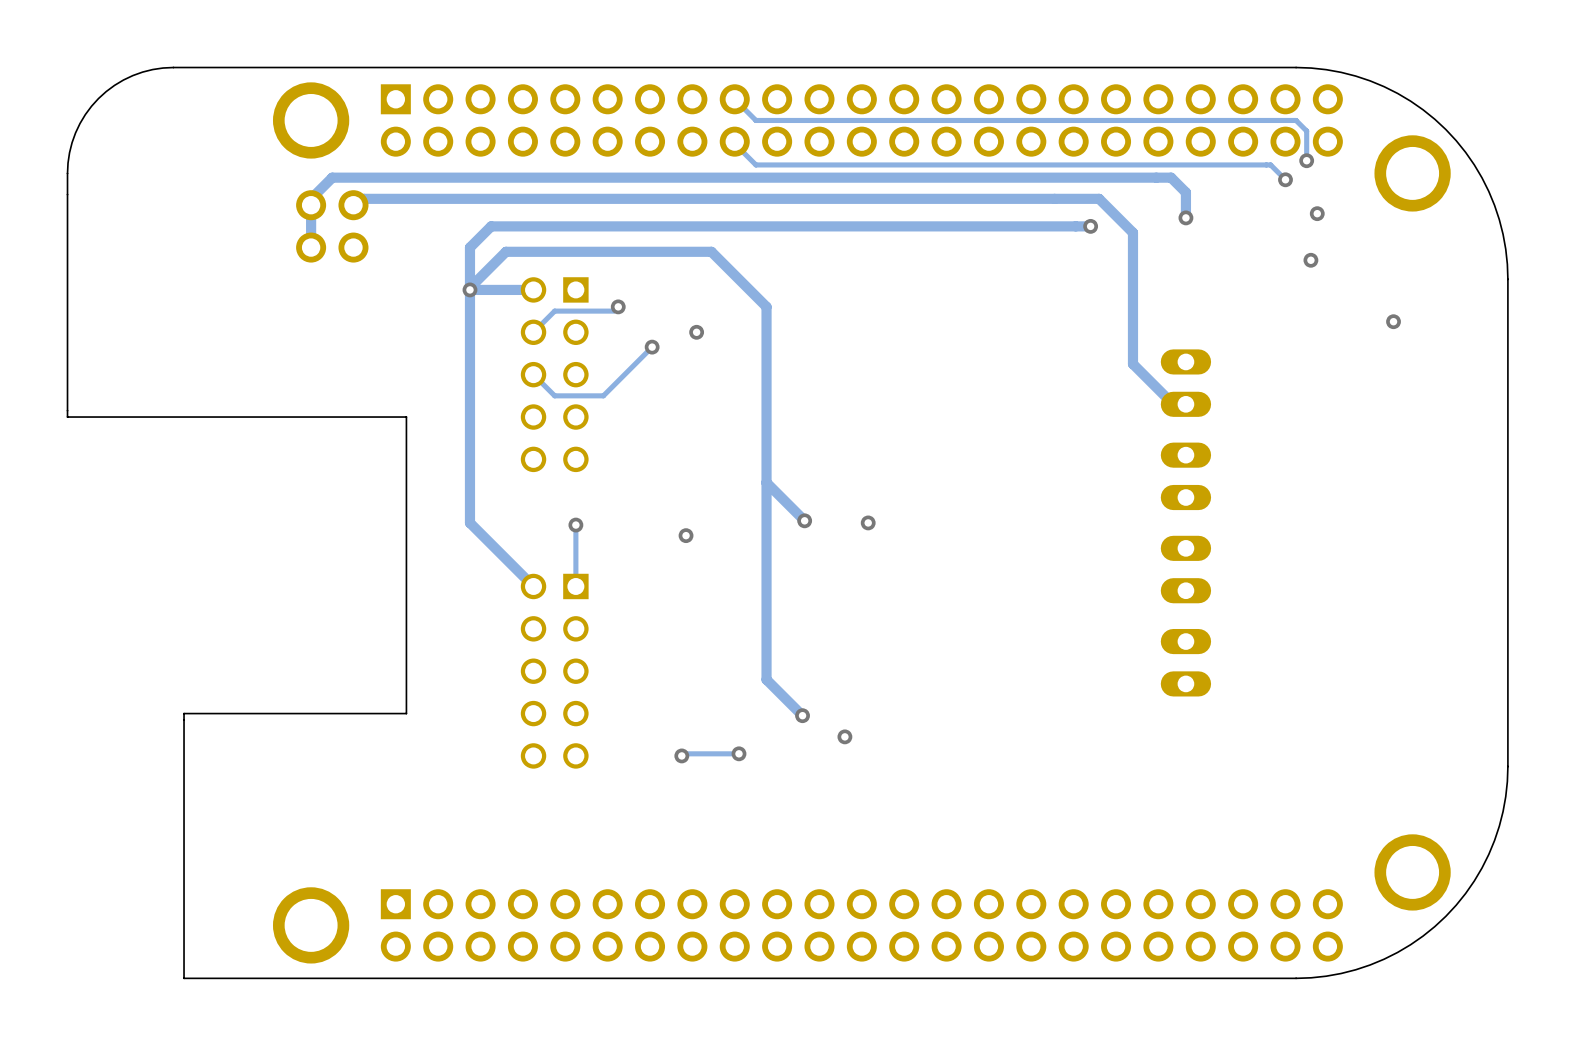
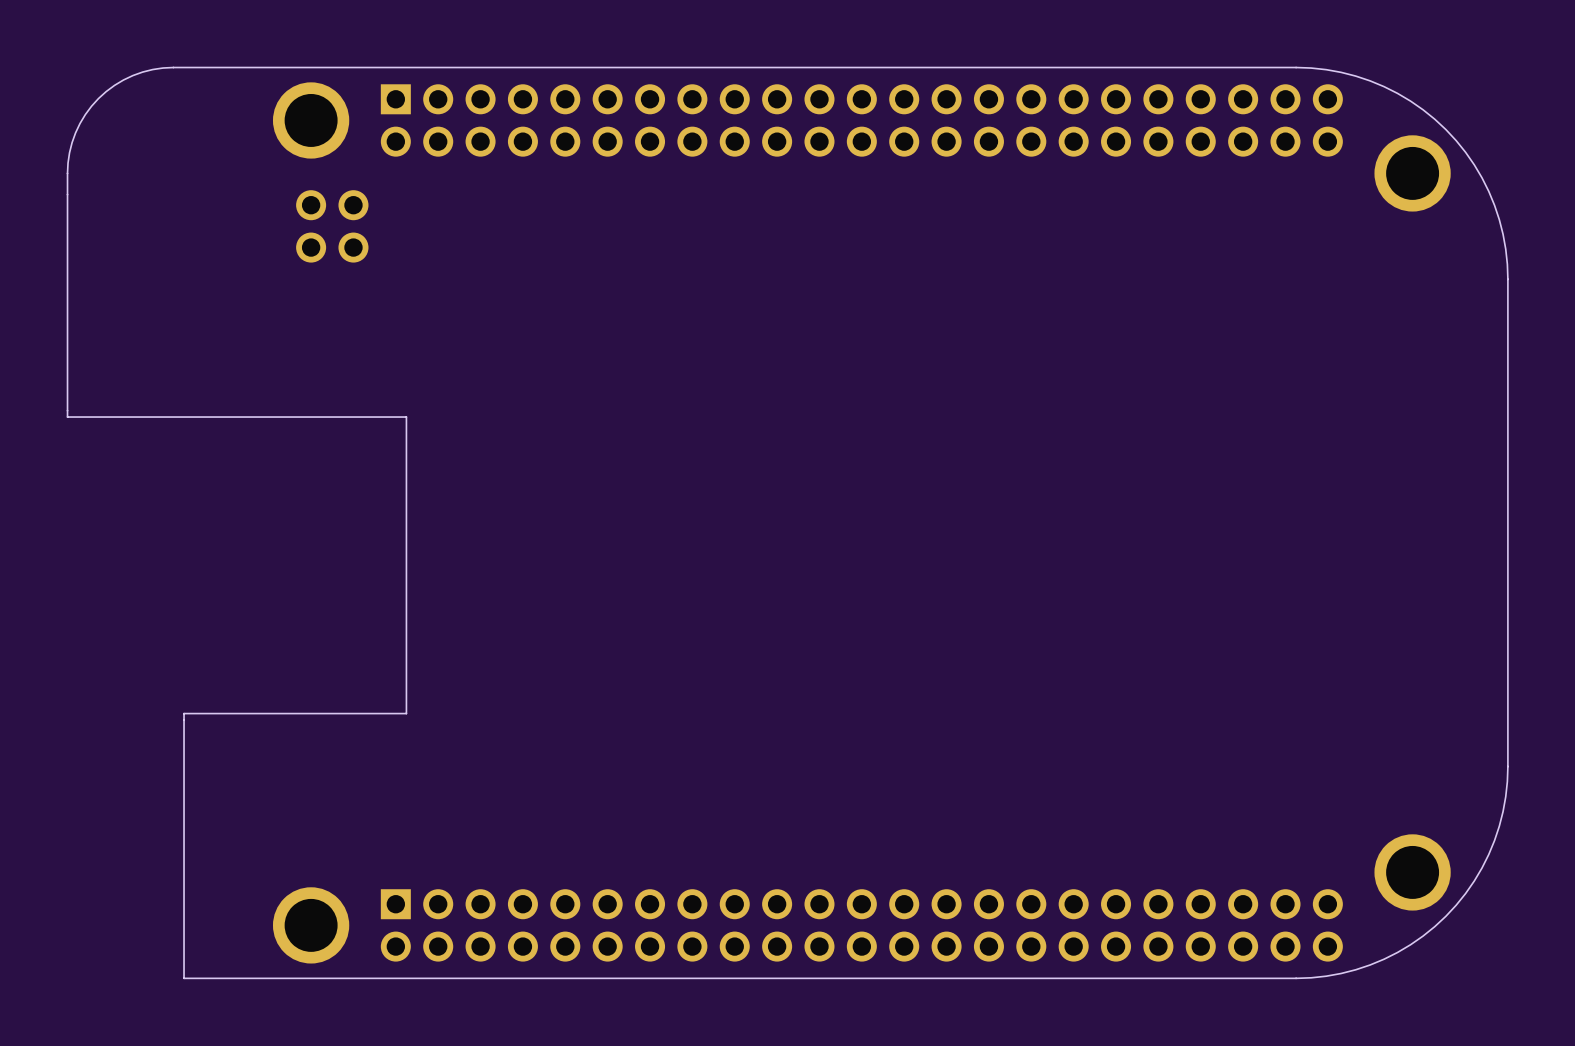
track: (734, 99) (755, 120) (1296, 120) (1306, 131) (1306, 160) -> none
track: (734, 141) (755, 164) (1270, 164) (1285, 179) -> none
via: (1306, 160) -> none
via: (1285, 179) -> none
track: (353, 205) (357, 205) (364, 198) (1099, 198) (1132, 232) (1132, 364) (1173, 404) (1185, 404) -> none
via: (1317, 213) -> none
track: (1185, 217) (1185, 192) (1171, 177) (332, 177) (311, 198) (311, 247) -> none
via: (1185, 217) -> none
track: (1090, 226) (491, 226) (469, 247) (469, 522) (533, 586) -> none
via: (1090, 226) -> none
via: (1310, 260) -> none
track: (469, 287) (505, 251) (711, 251) (766, 306) (766, 679) (802, 715) -> none
via: (469, 289) -> none
track: (533, 289) (469, 289) -> none
track: (618, 306) (614, 311) (554, 311) (533, 332) -> none
via: (618, 306) -> none
via: (1393, 321) -> none
via: (696, 332) -> none
track: (652, 347) (603, 395) (554, 395) (533, 374) -> none
via: (652, 347) -> none
part: (554, 374) -> none
part: (1185, 383) -> none
part: (1185, 476) -> none
track: (766, 482) (804, 520) -> none
via: (804, 520) -> none
via: (868, 522) -> none
track: (575, 525) (575, 586) -> none
via: (575, 525) -> none
via: (686, 535) -> none
part: (1185, 569) -> none
part: (1185, 662) -> none
part: (554, 671) -> none
via: (802, 715) -> none
via: (844, 736) -> none
track: (738, 753) (683, 753) (681, 755) -> none
via: (738, 753) -> none
via: (681, 755) -> none

